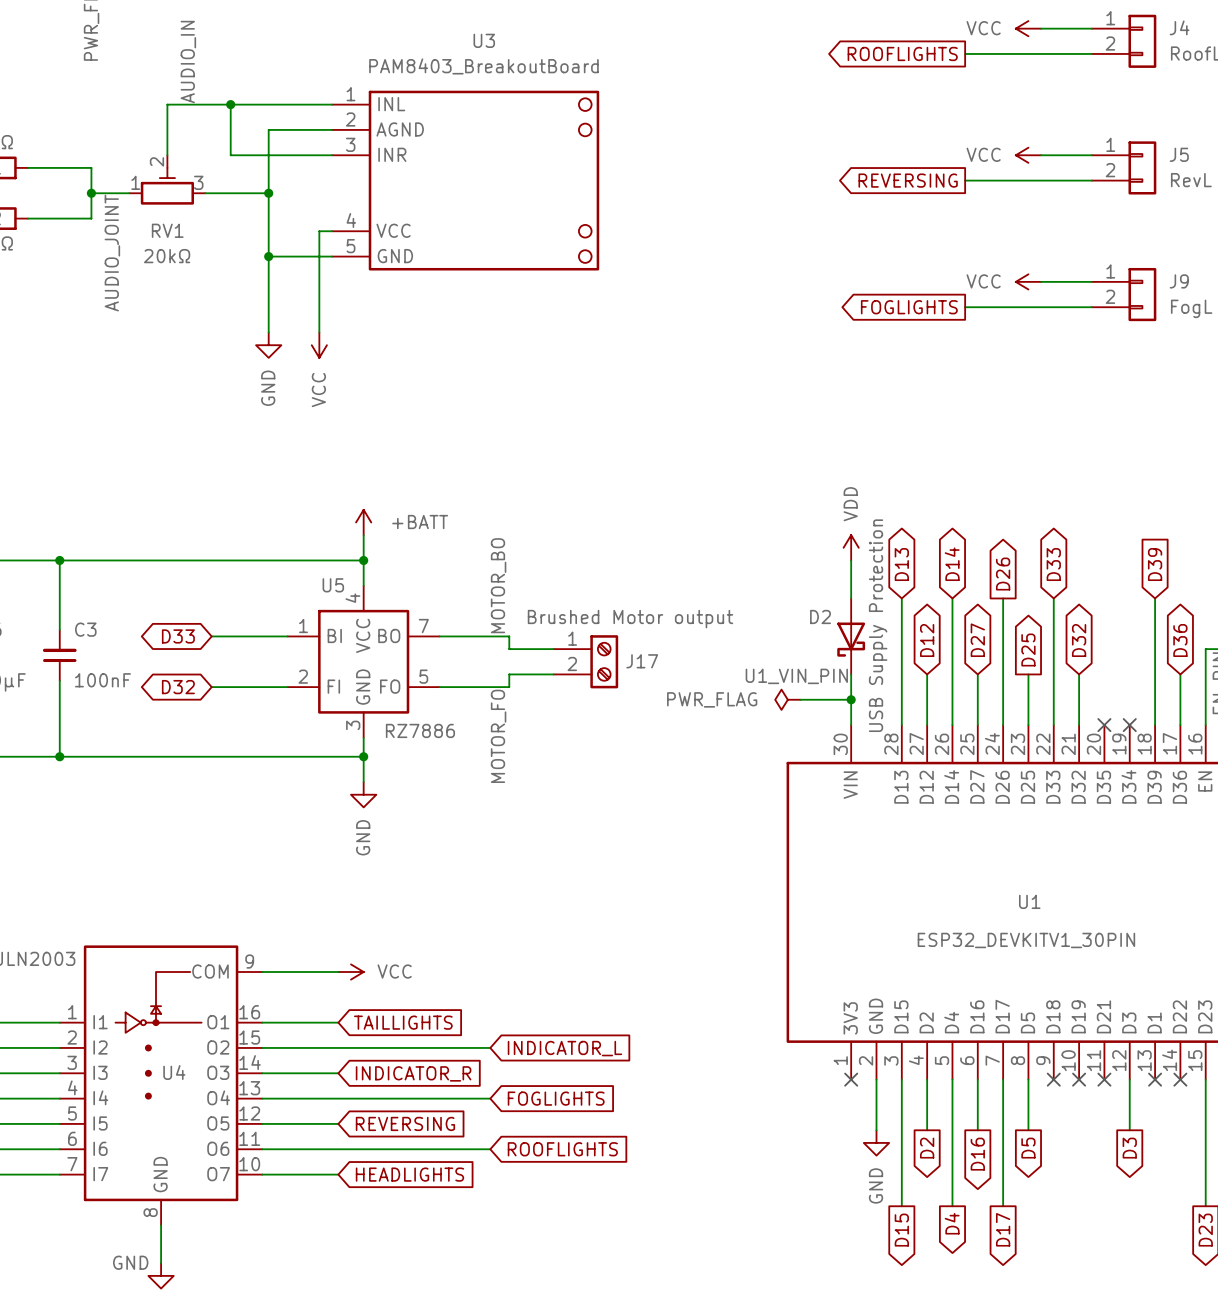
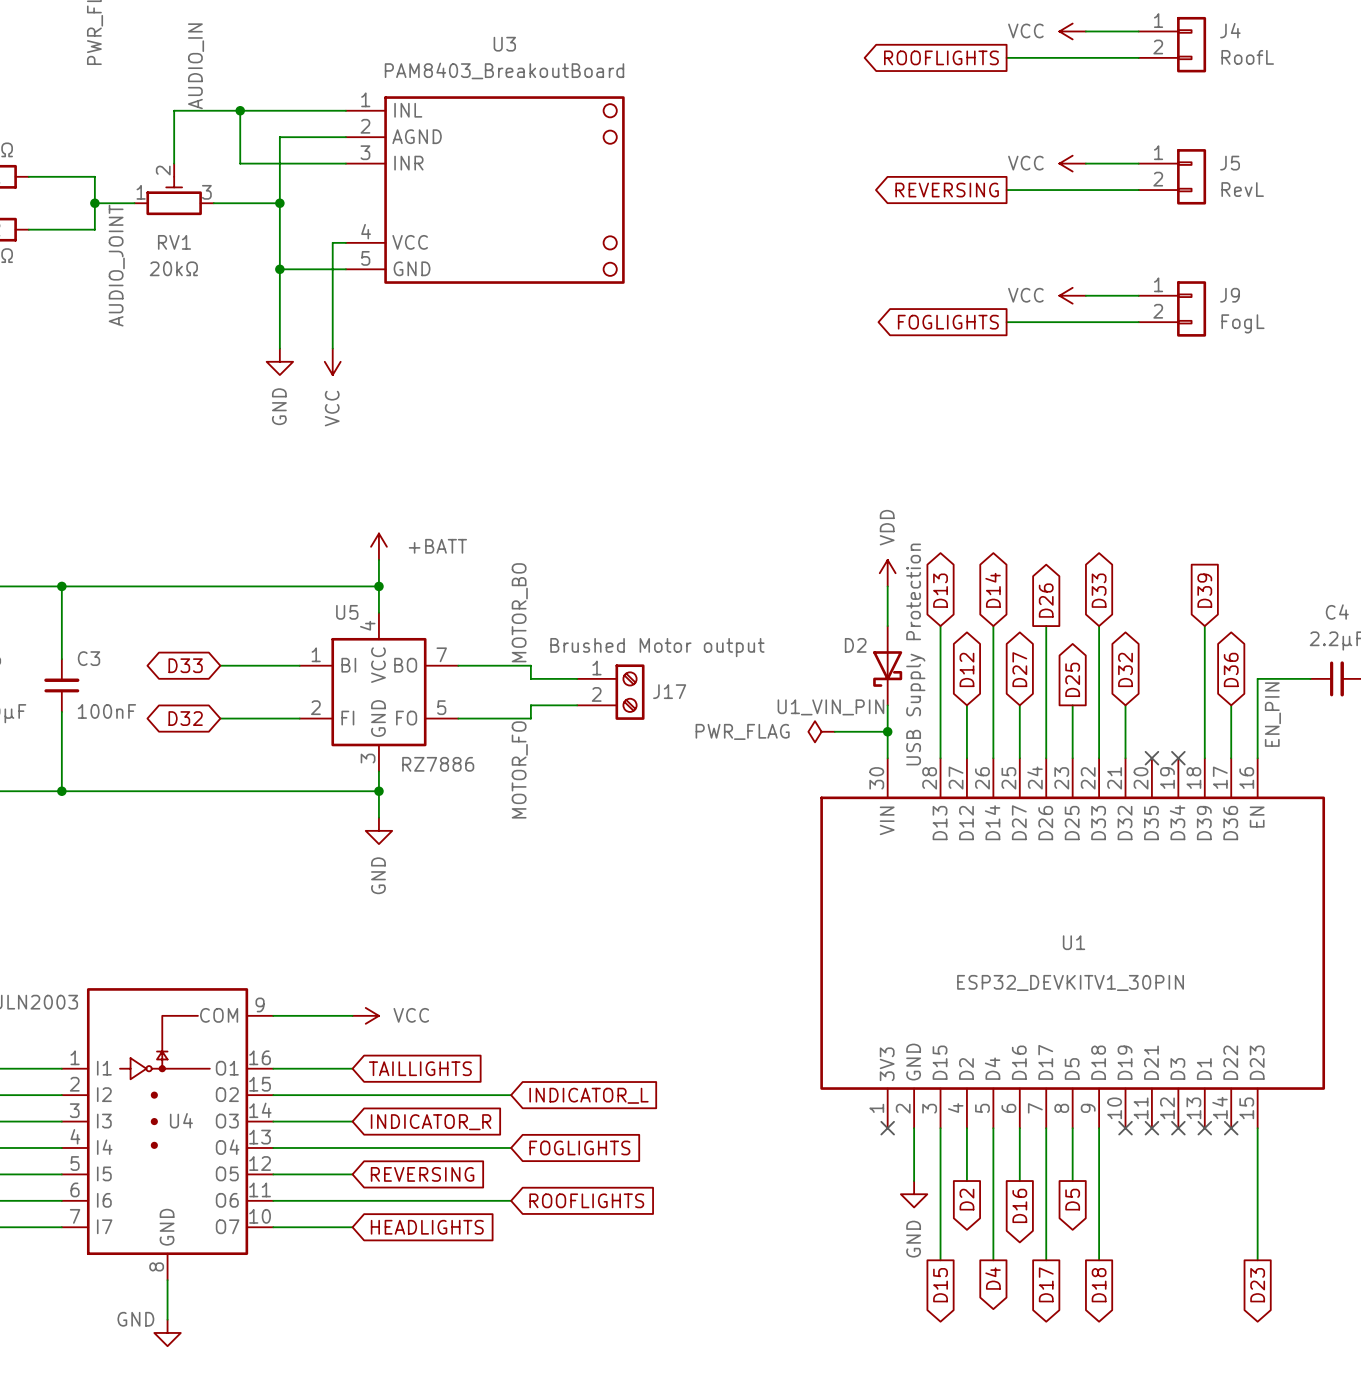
wire: none -> (1099, 1128) (1099, 1260)
no-connect mark: (1053, 1079) -> none
wire: (1129, 1079) (1129, 1130) -> none
no-connect mark: none -> (1178, 1128)
global label: D3 (1129, 1148) -> none
global label: none -> D18 (1099, 1285)

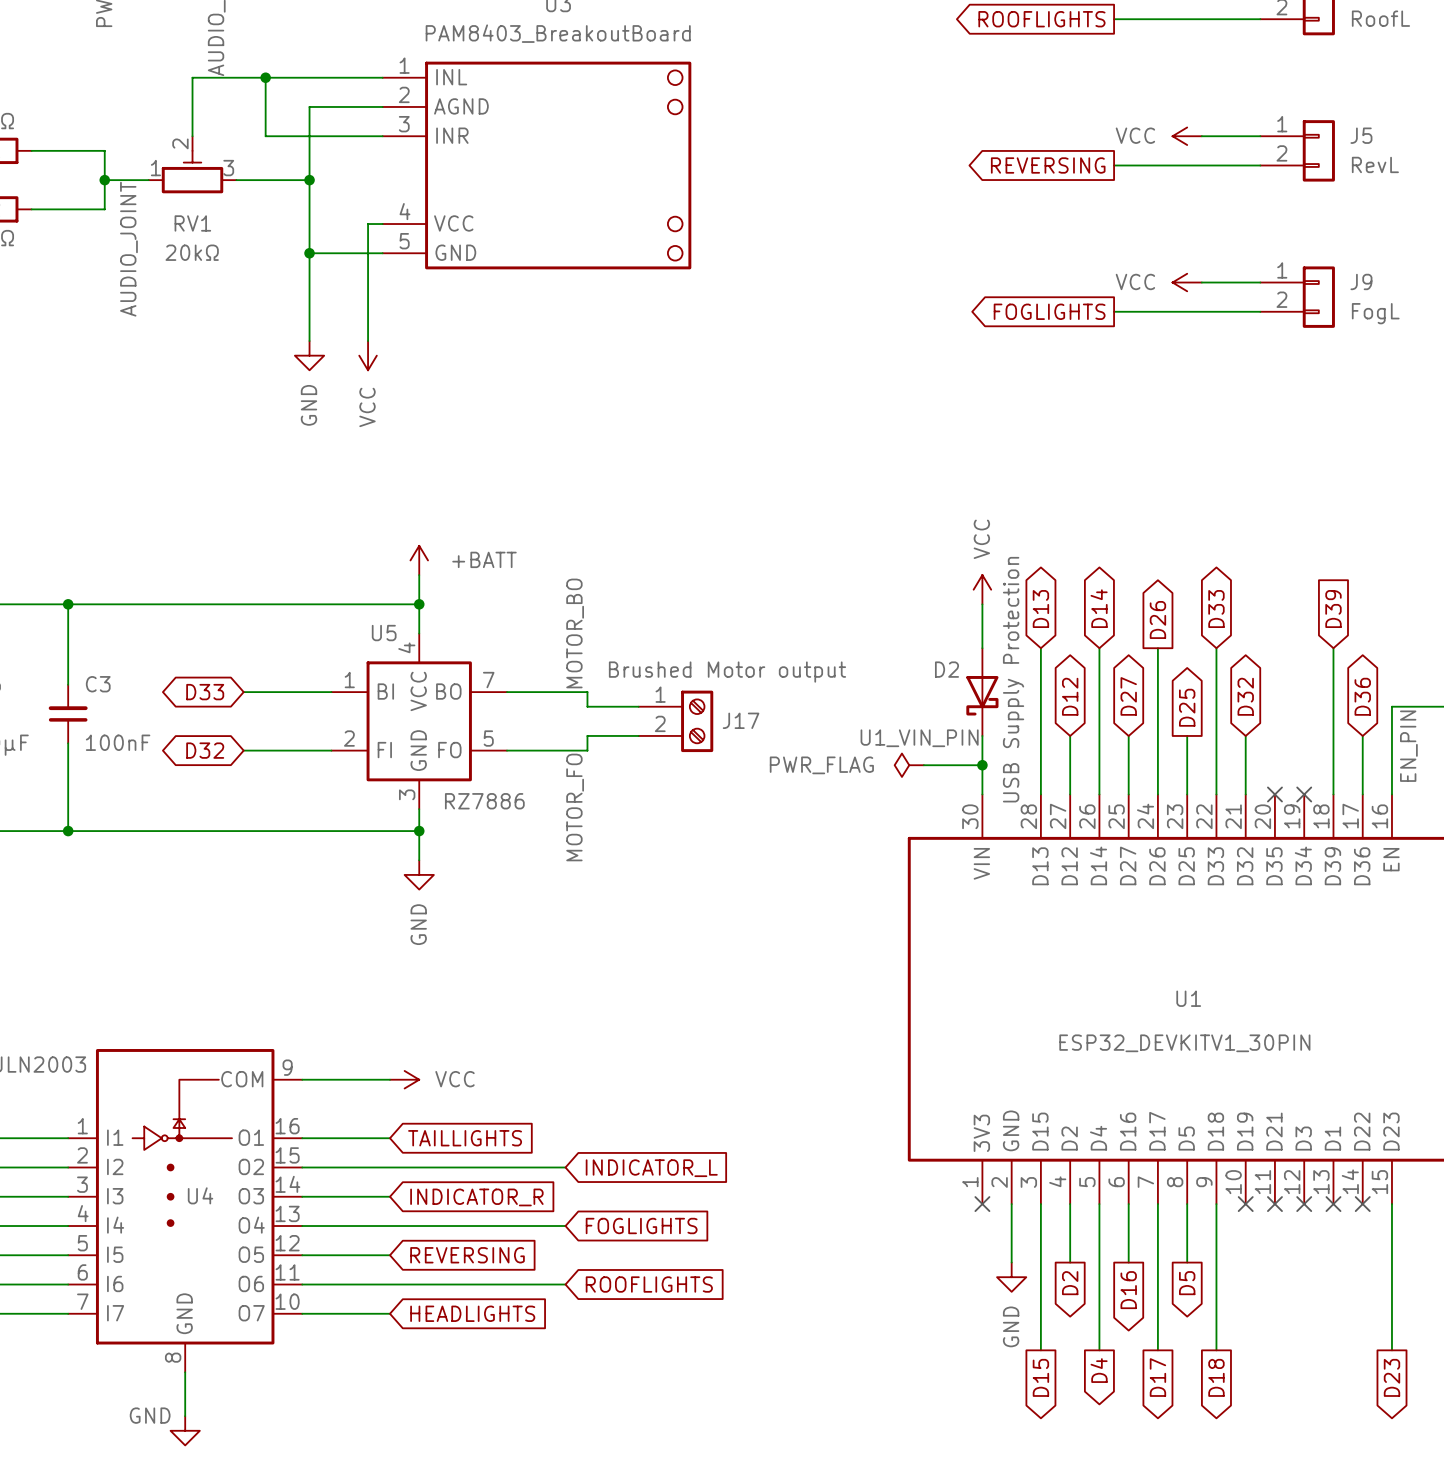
power symbol: VDD (887, 573) -> VCC (982, 589)

